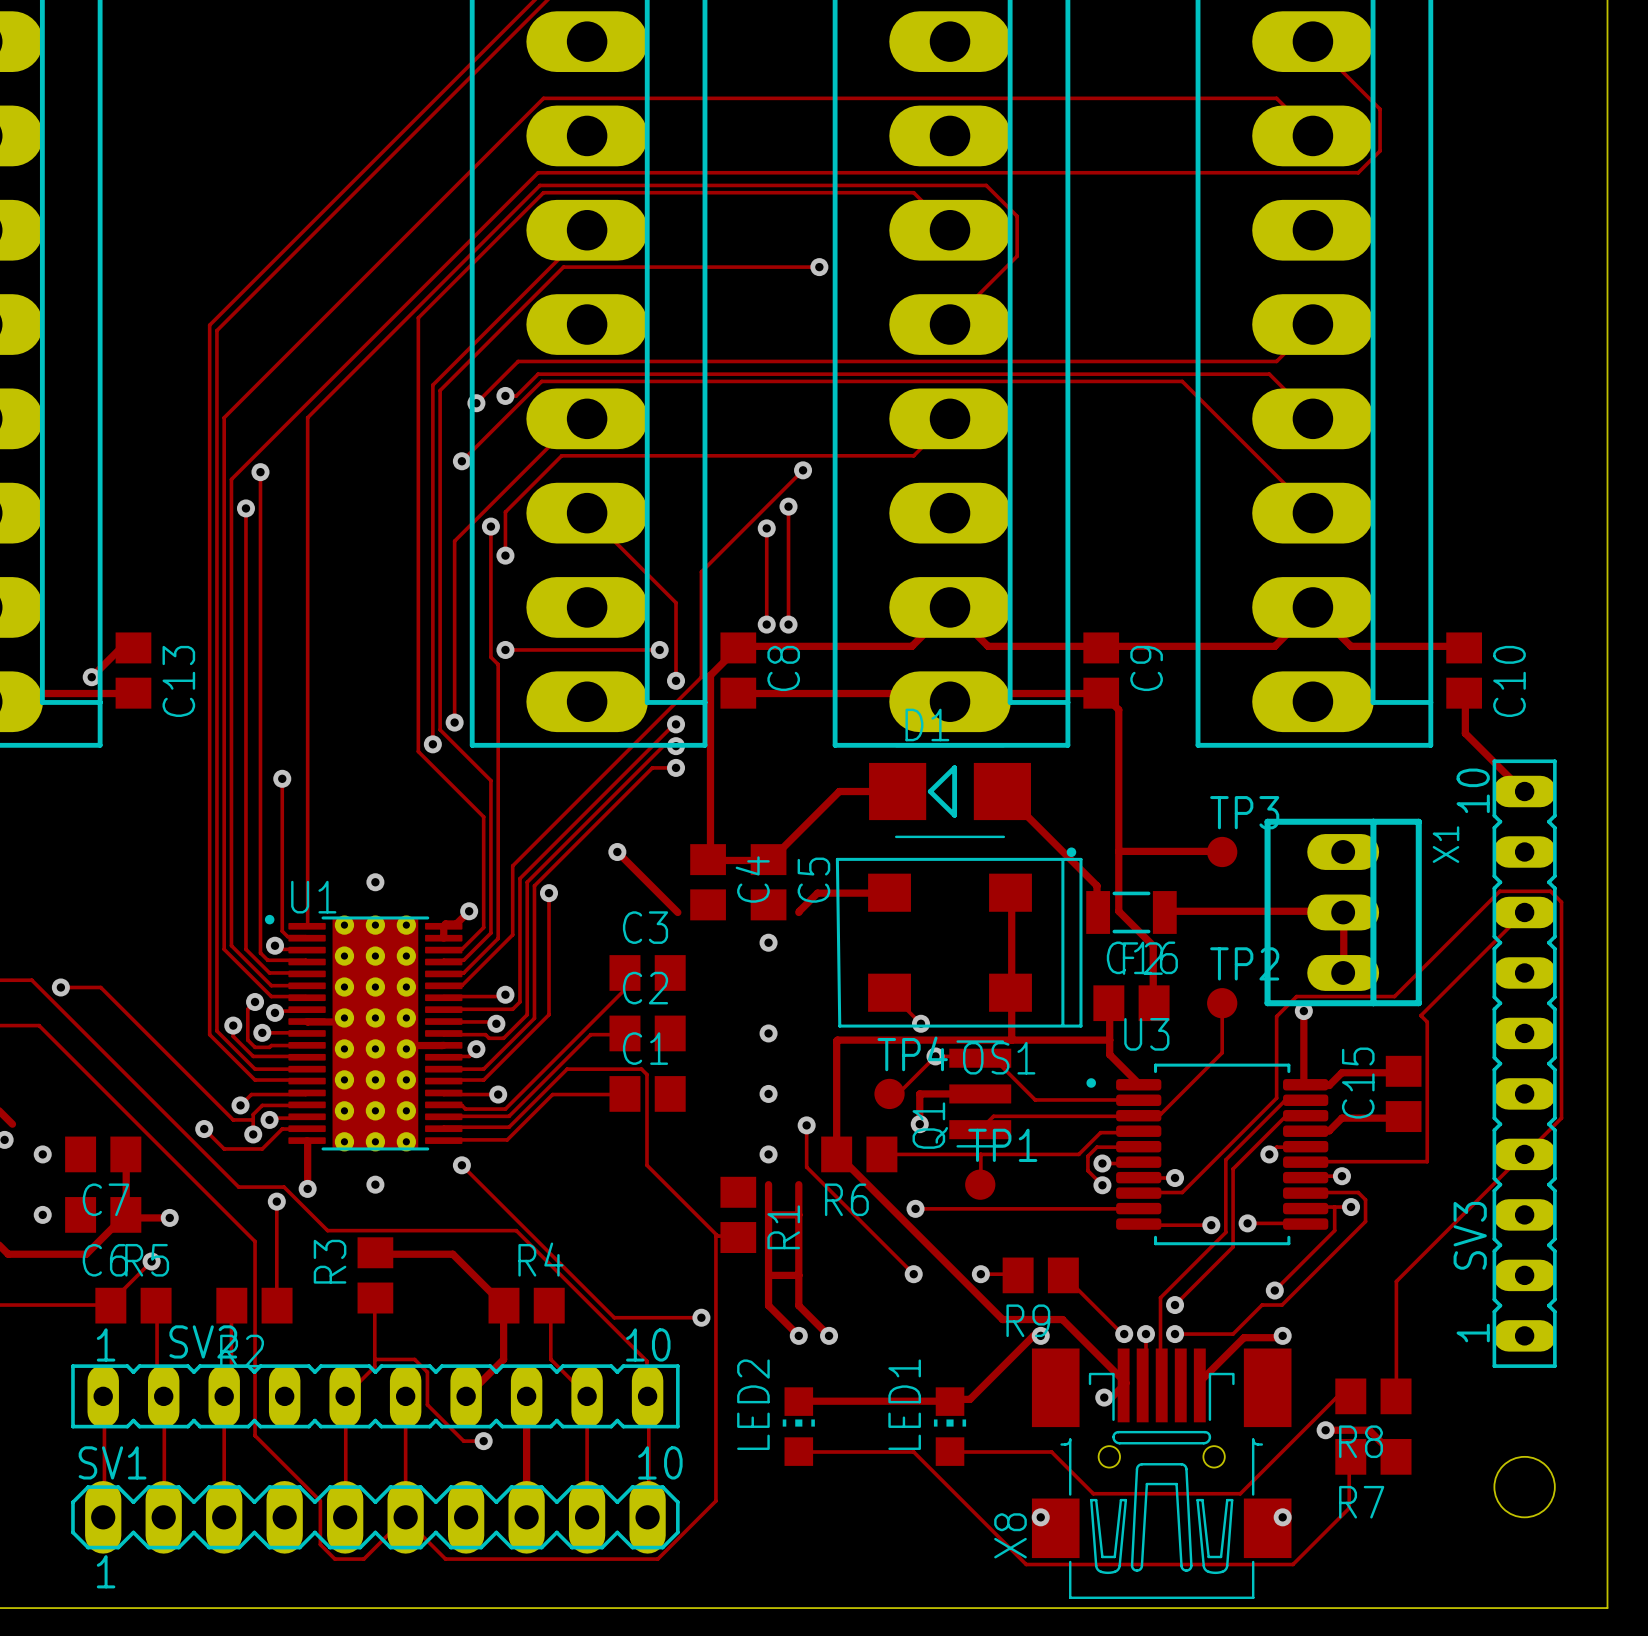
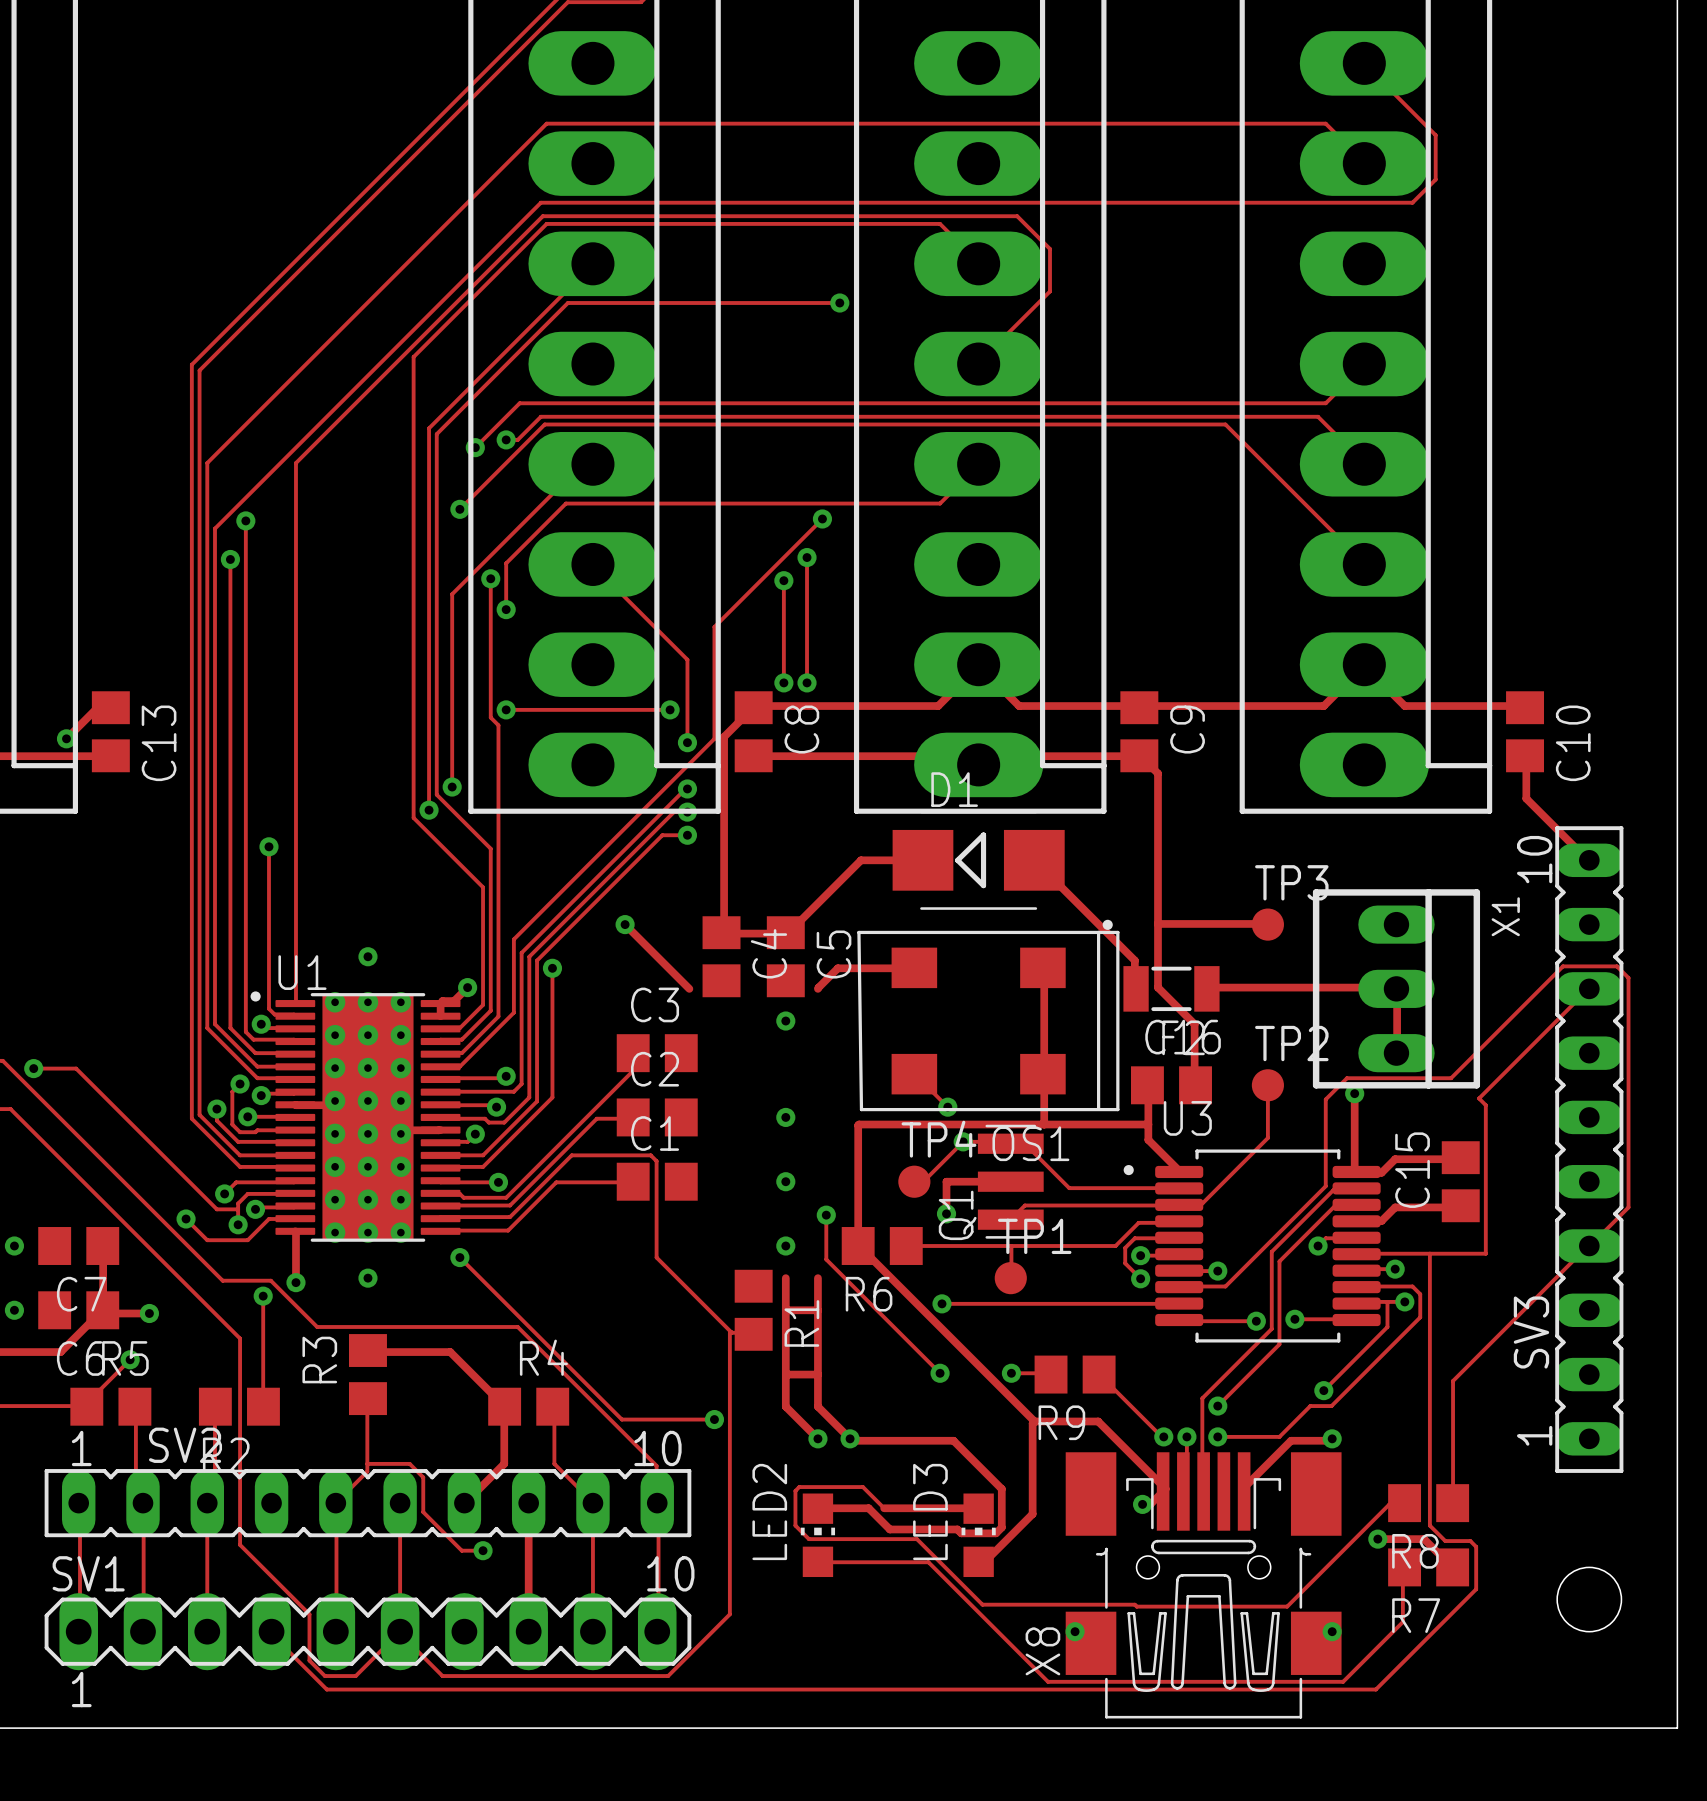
track: none -> (1429, 1253) (1429, 1525) (1445, 1541) (1470, 1541) (1476, 1546) (1476, 1589) (1375, 1689) (326, 1689) (272, 1635) (271, 1631)
track: none -> (1034, 1421) (1032, 1423) (1032, 1514) (986, 1560) (978, 1561)
track: (1040, 1335) (1033, 1335) (969, 1399) (951, 1399) (950, 1401) -> none
via: (1040, 1335) -> none
track: (846, 1401) (861, 1401) -> (868, 1508) (889, 1529) (957, 1529) (961, 1533) (996, 1533) (1001, 1527) (1001, 1488) (953, 1440) (853, 1440) (850, 1438)
LED1 name: LED1 (904, 1404) -> LED3 (930, 1511)
track: (902, 1452) (913, 1452) -> (884, 1508) (862, 1487) (799, 1487) (795, 1490) (795, 1525) (808, 1539) (916, 1539) (940, 1562)
track: (950, 1452) (1051, 1452) (1093, 1493) (1098, 1493) -> (982, 1604) (1134, 1604) (1136, 1606)
track: (953, 1491) (1026, 1564) -> (928, 1562) (1048, 1681) (1059, 1681)

